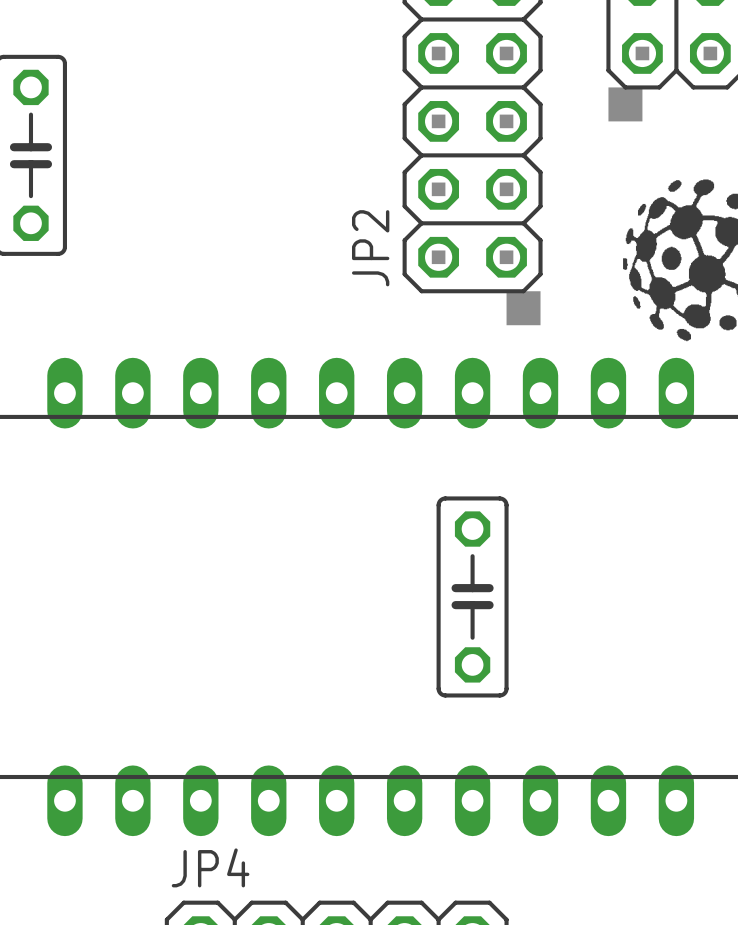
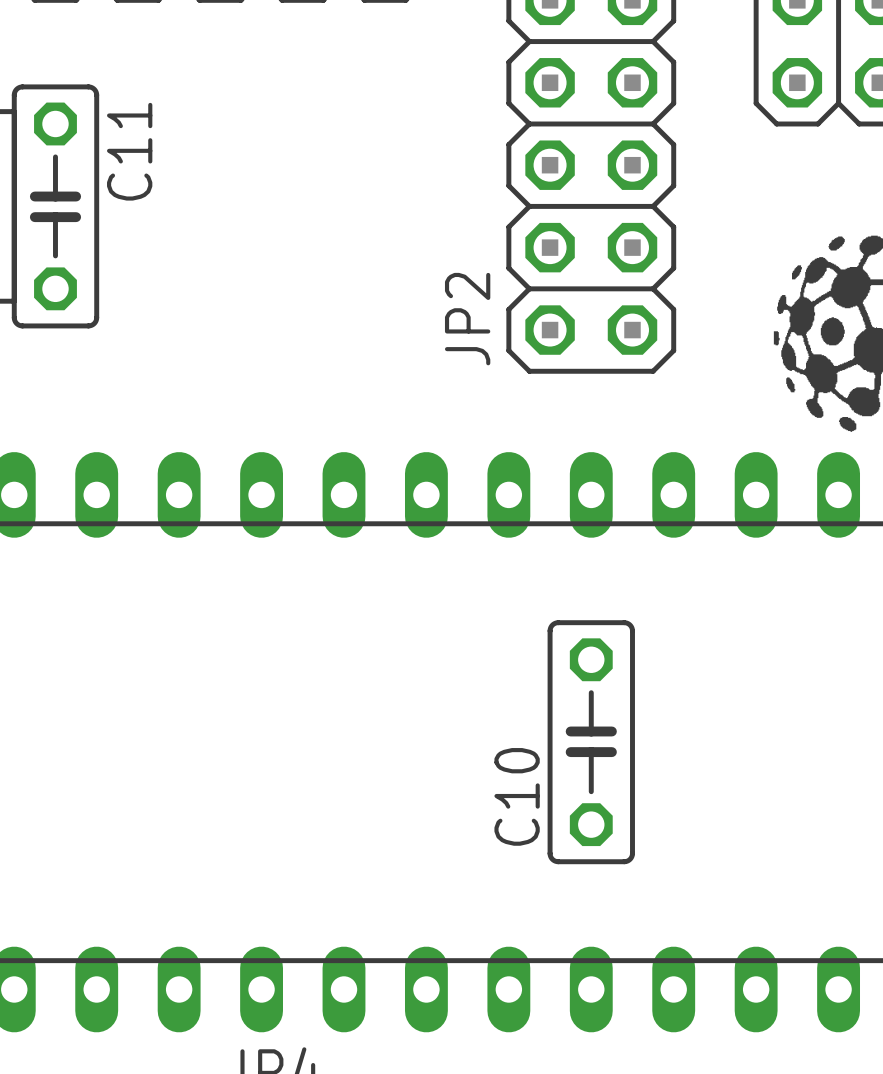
drawing: [608, 87, 643, 122] -> none
C11 name: none -> C11 (129, 151)
drawing: [506, 291, 541, 326] -> none
C10 name: none -> C10 (517, 796)

